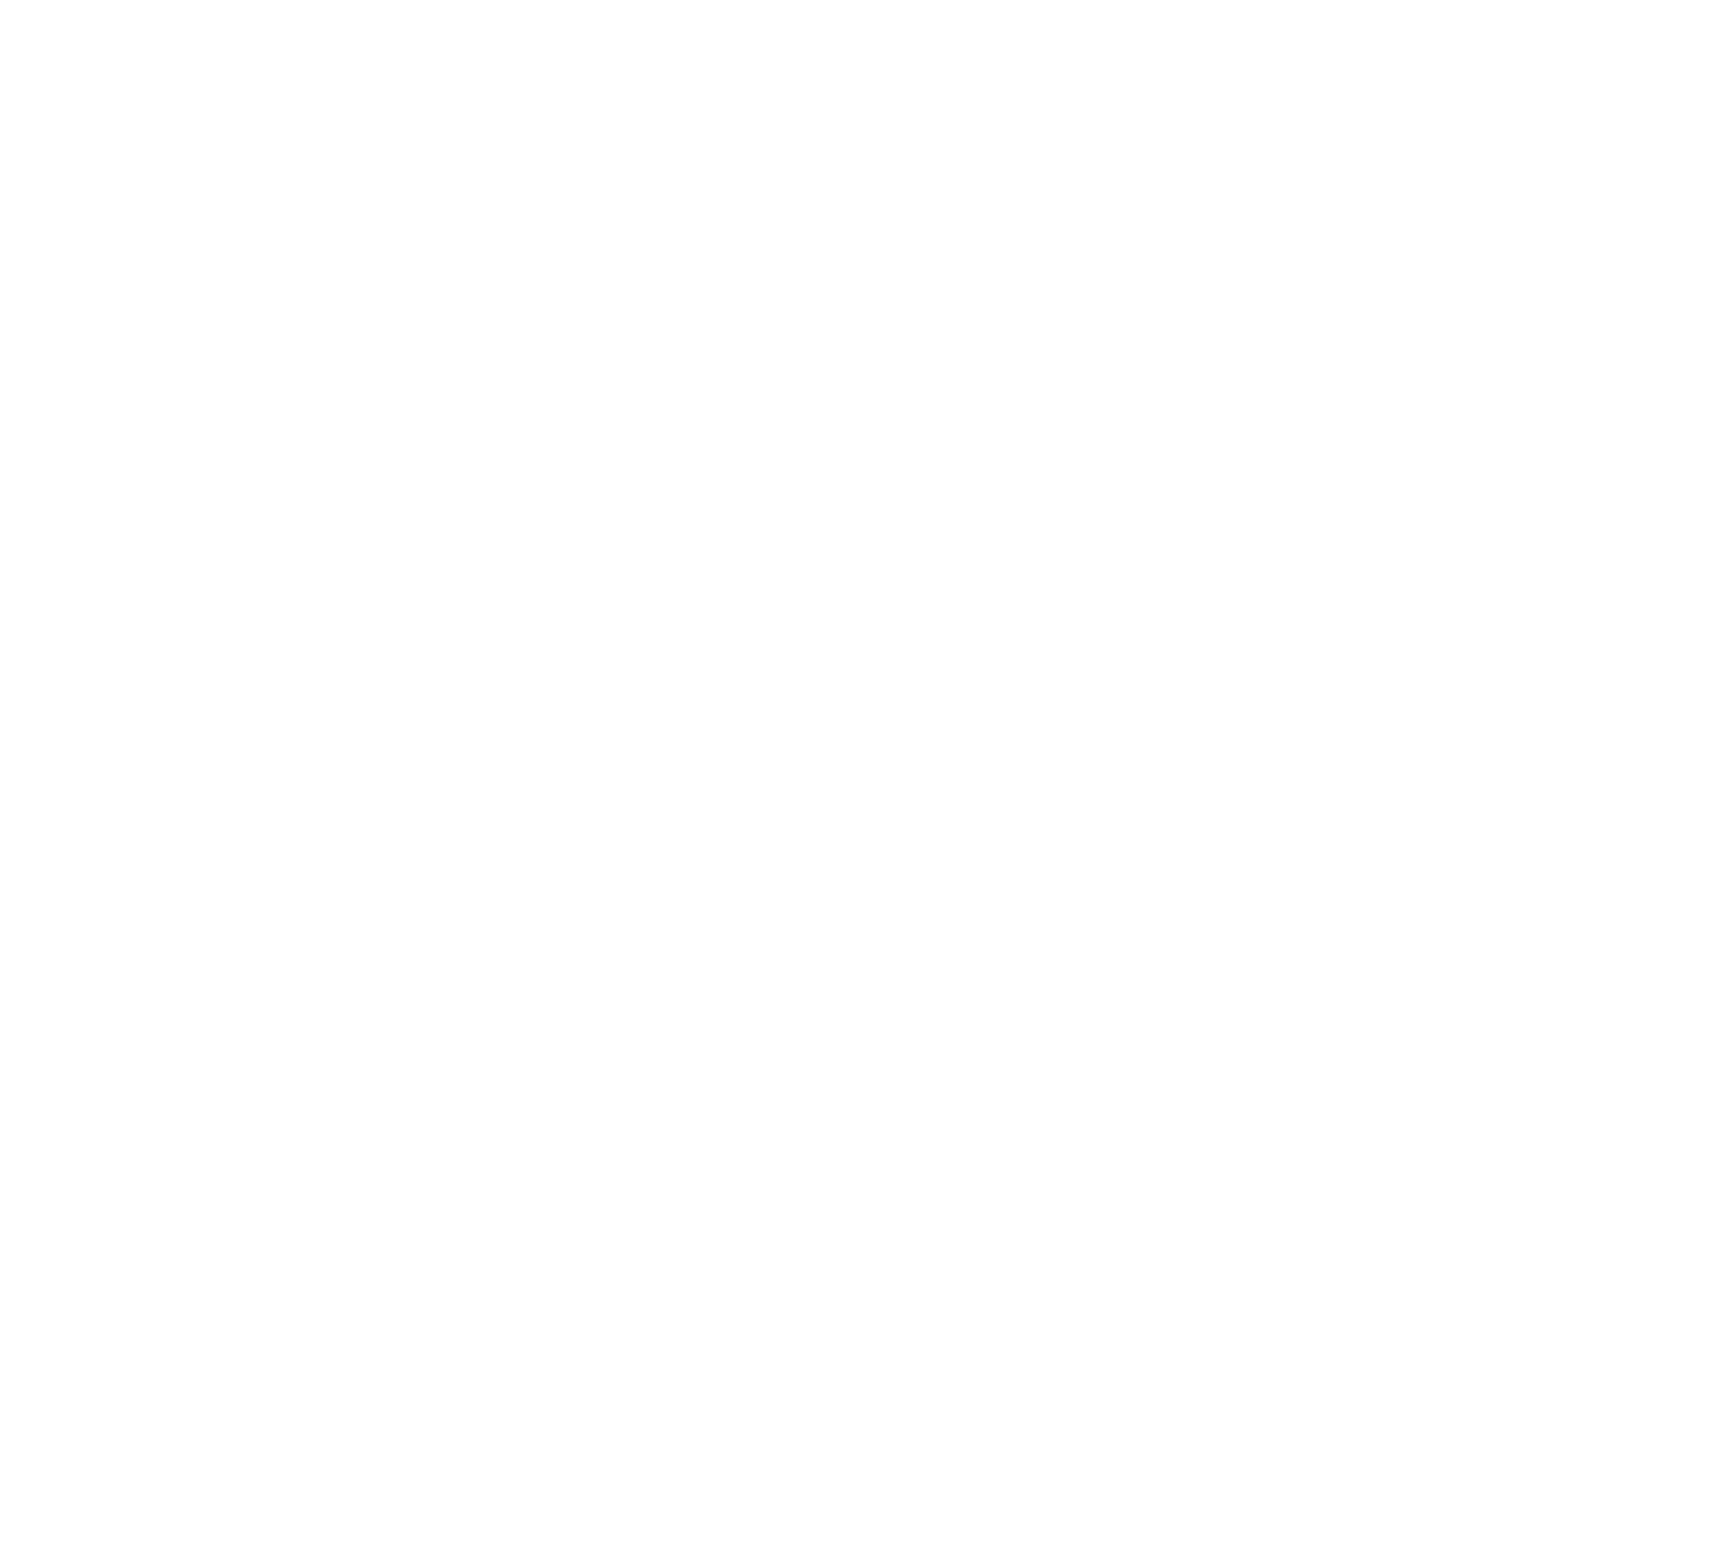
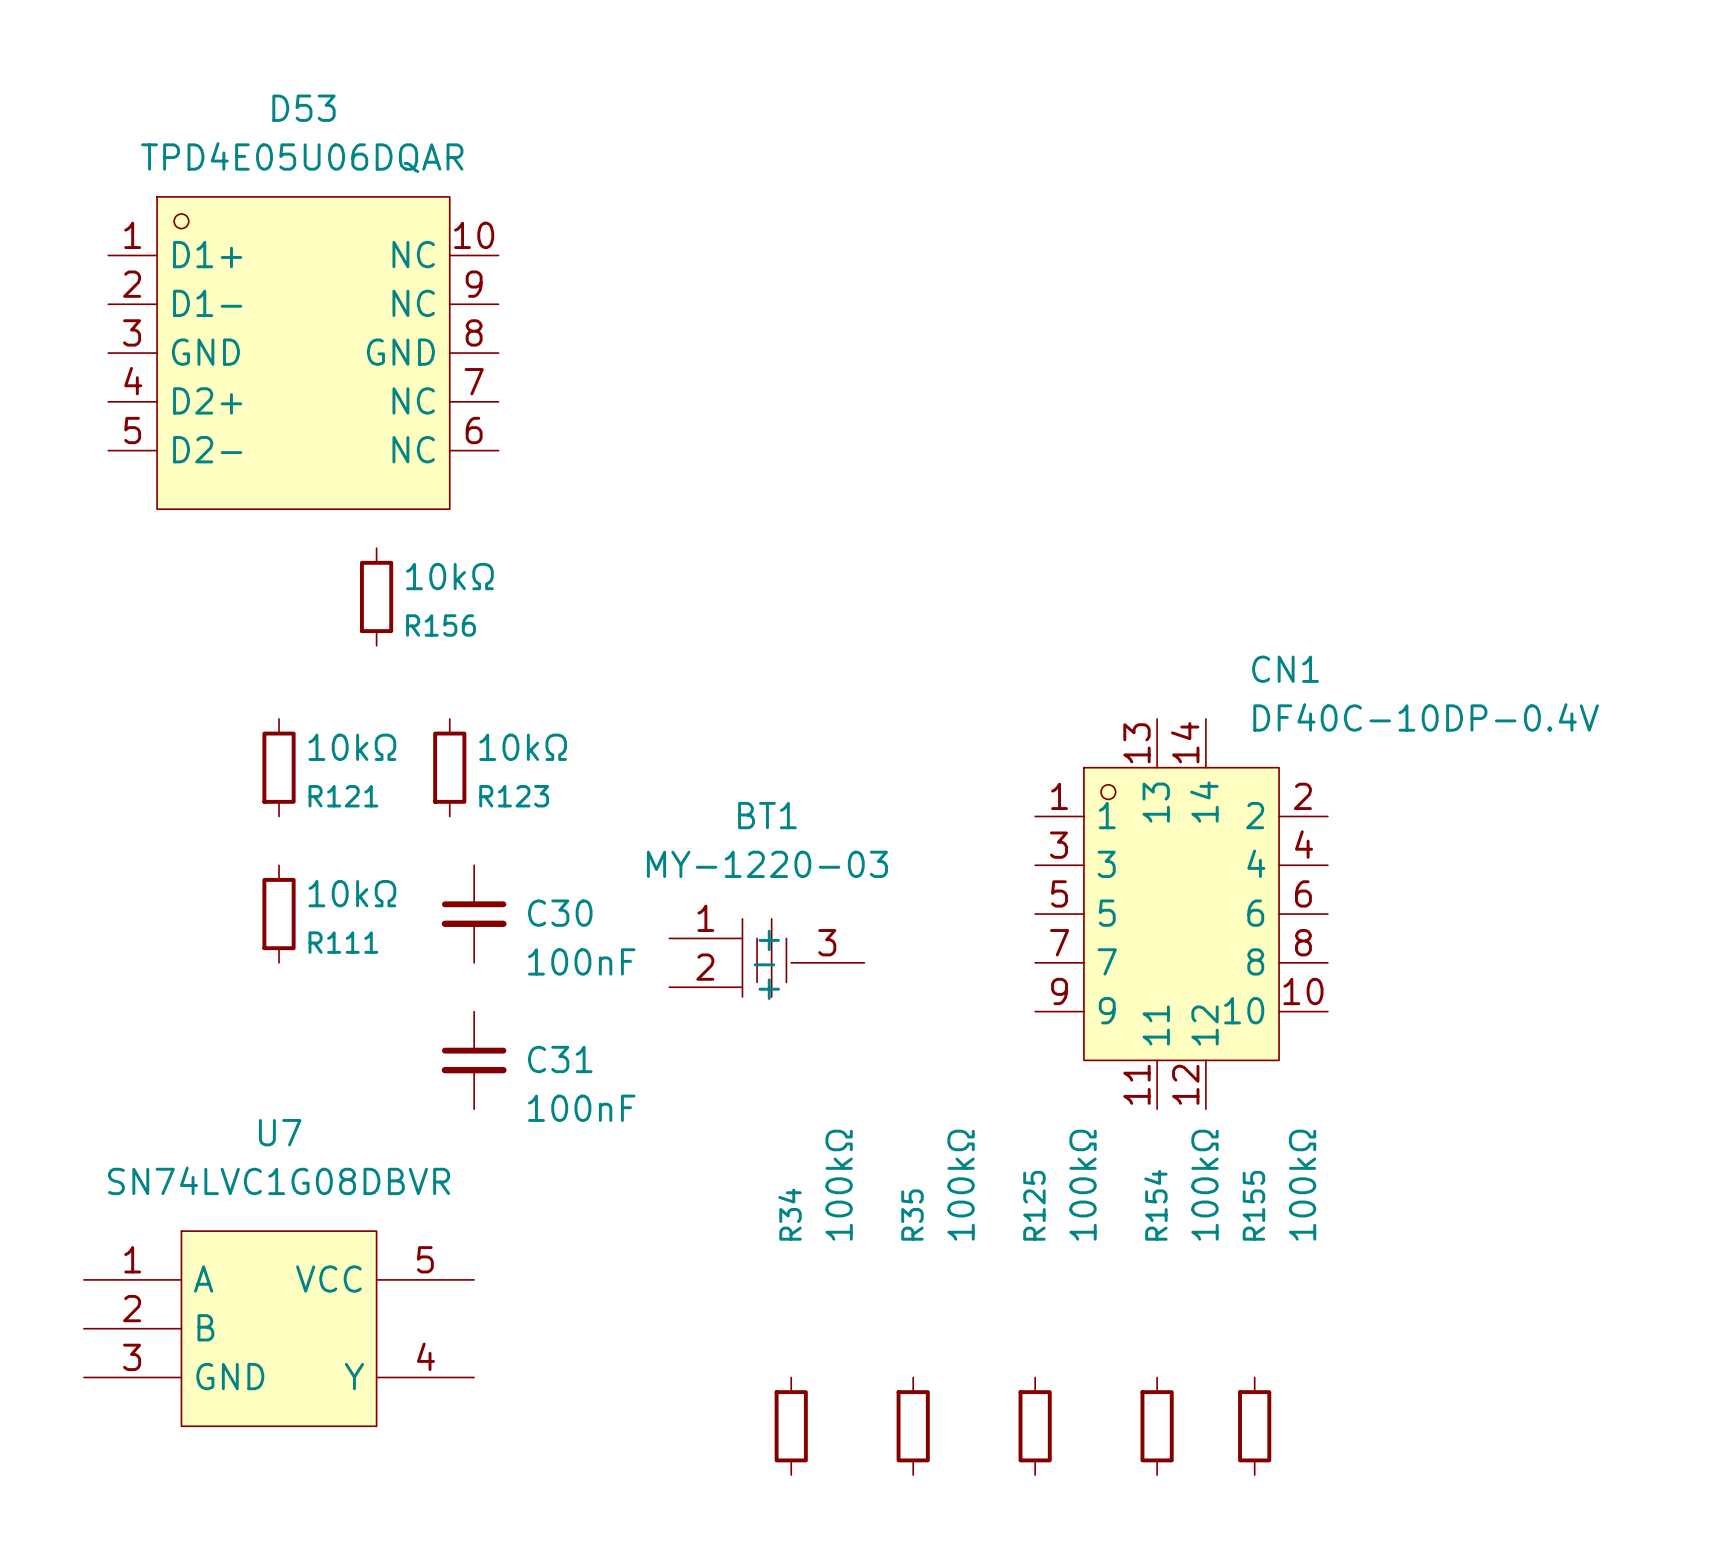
D53: none -> TPD4E05U06DQAR (303, 353)
R156: none -> 10kΩ (376, 596)
R121: none -> 10kΩ (279, 767)
R123: none -> 10kΩ (449, 767)
R111: none -> 10kΩ (279, 914)
C30: none -> 100nF (474, 914)
CN1: none -> DF40C-10DP-0.4V (1181, 914)
BT1: none -> MY-1220-03 (766, 957)
C31: none -> 100nF (474, 1060)
U7: none -> SN74LVC1G08DBVR (279, 1328)
R34: none -> 100kΩ (791, 1426)
R35: none -> 100kΩ (913, 1426)
R125: none -> 100kΩ (1035, 1426)
R154: none -> 100kΩ (1157, 1426)
R155: none -> 100kΩ (1254, 1426)

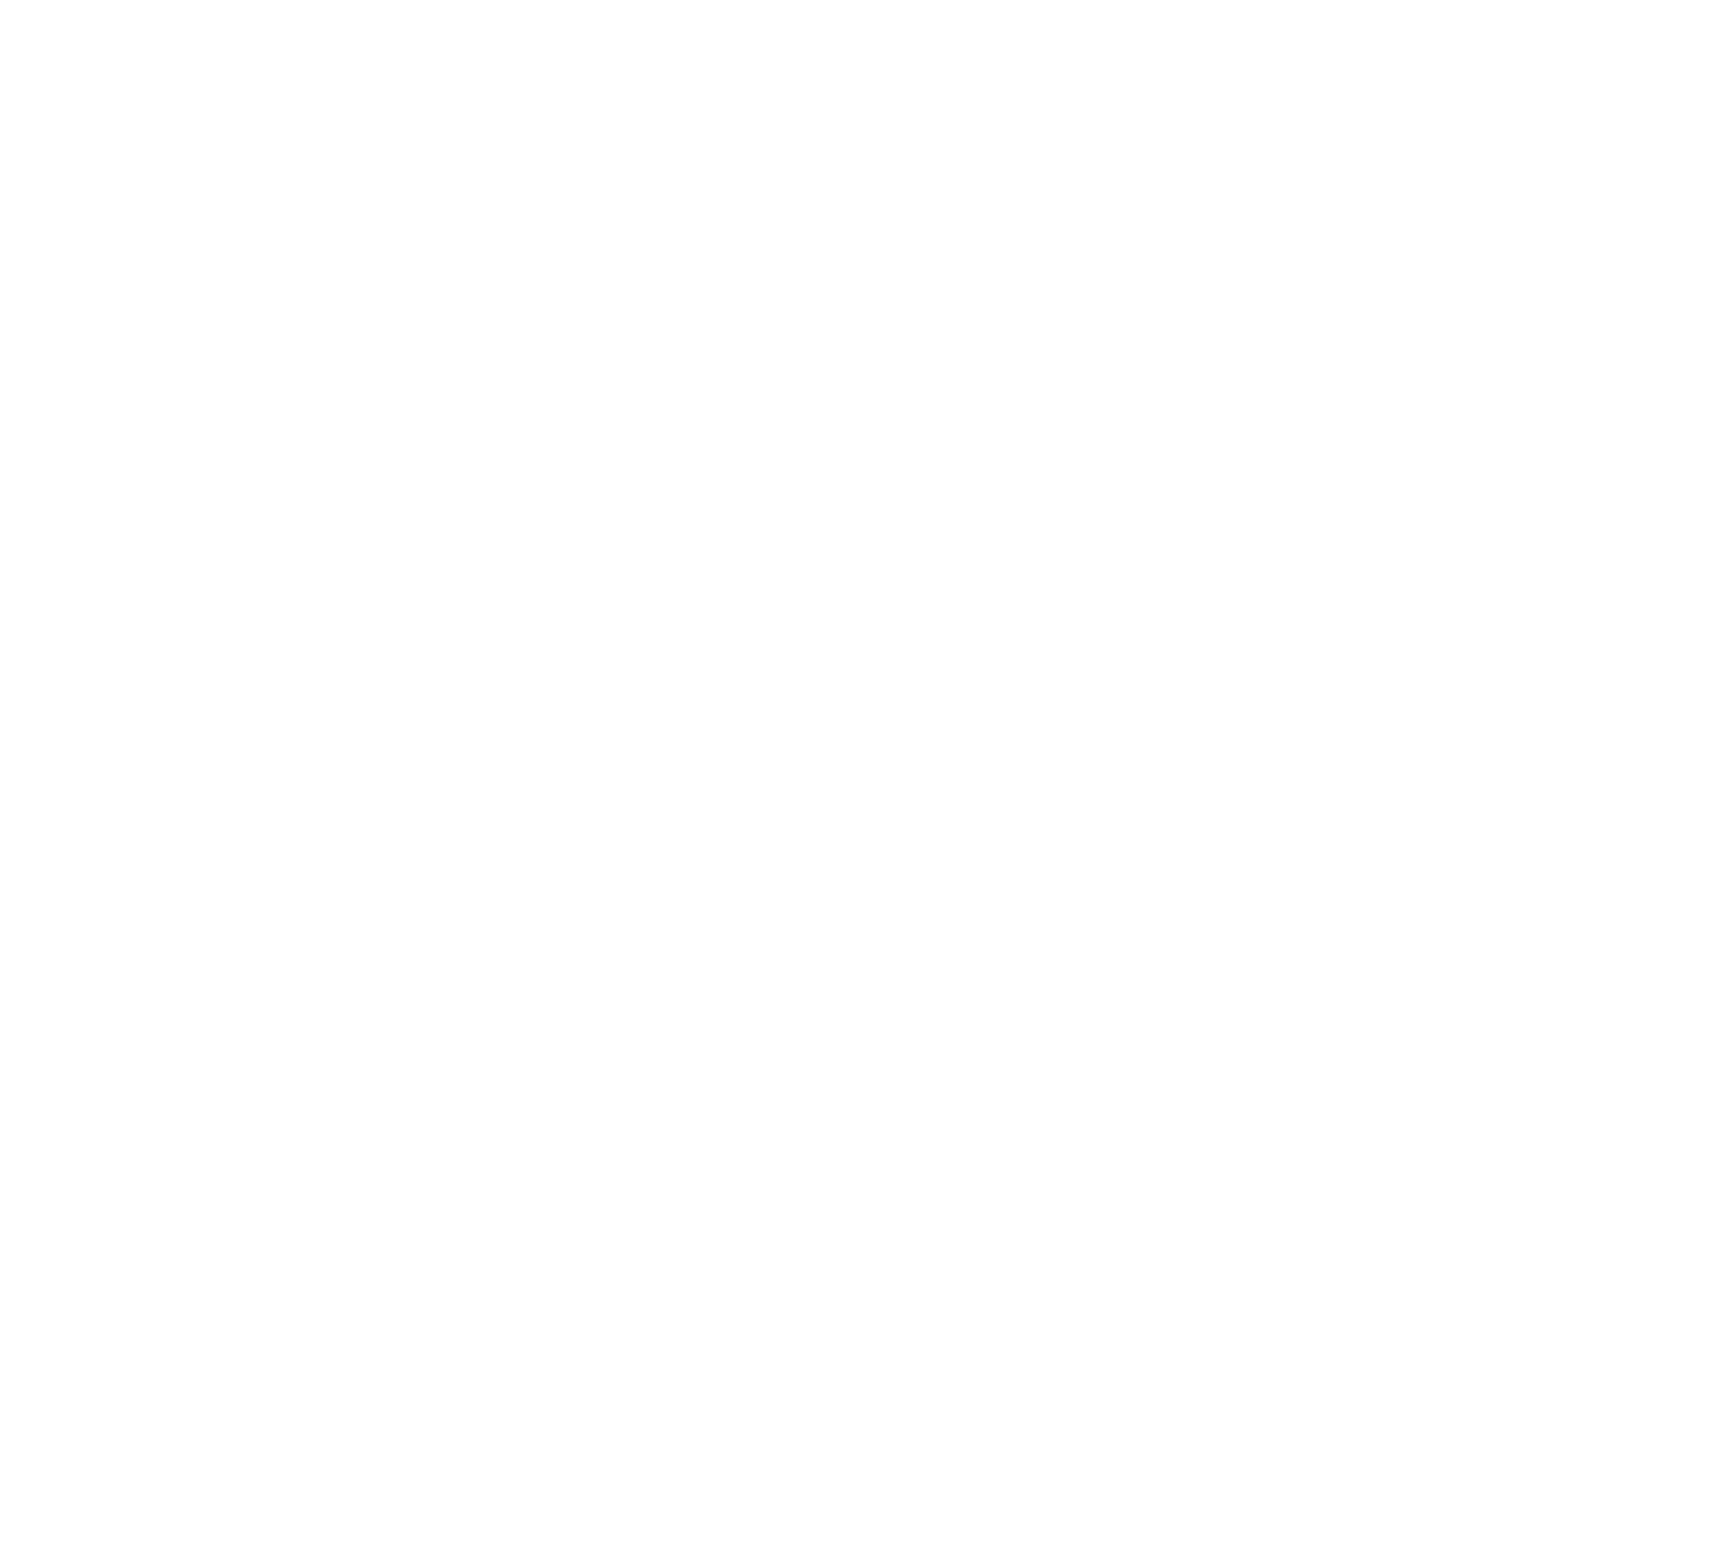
D53: TPD4E05U06DQAR (303, 353) -> none
R156: 10kΩ (376, 596) -> none
R121: 10kΩ (279, 767) -> none
R123: 10kΩ (449, 767) -> none
R111: 10kΩ (279, 914) -> none
C30: 100nF (474, 914) -> none
CN1: DF40C-10DP-0.4V (1181, 914) -> none
BT1: MY-1220-03 (766, 957) -> none
C31: 100nF (474, 1060) -> none
U7: SN74LVC1G08DBVR (279, 1328) -> none
R34: 100kΩ (791, 1426) -> none
R35: 100kΩ (913, 1426) -> none
R125: 100kΩ (1035, 1426) -> none
R154: 100kΩ (1157, 1426) -> none
R155: 100kΩ (1254, 1426) -> none

